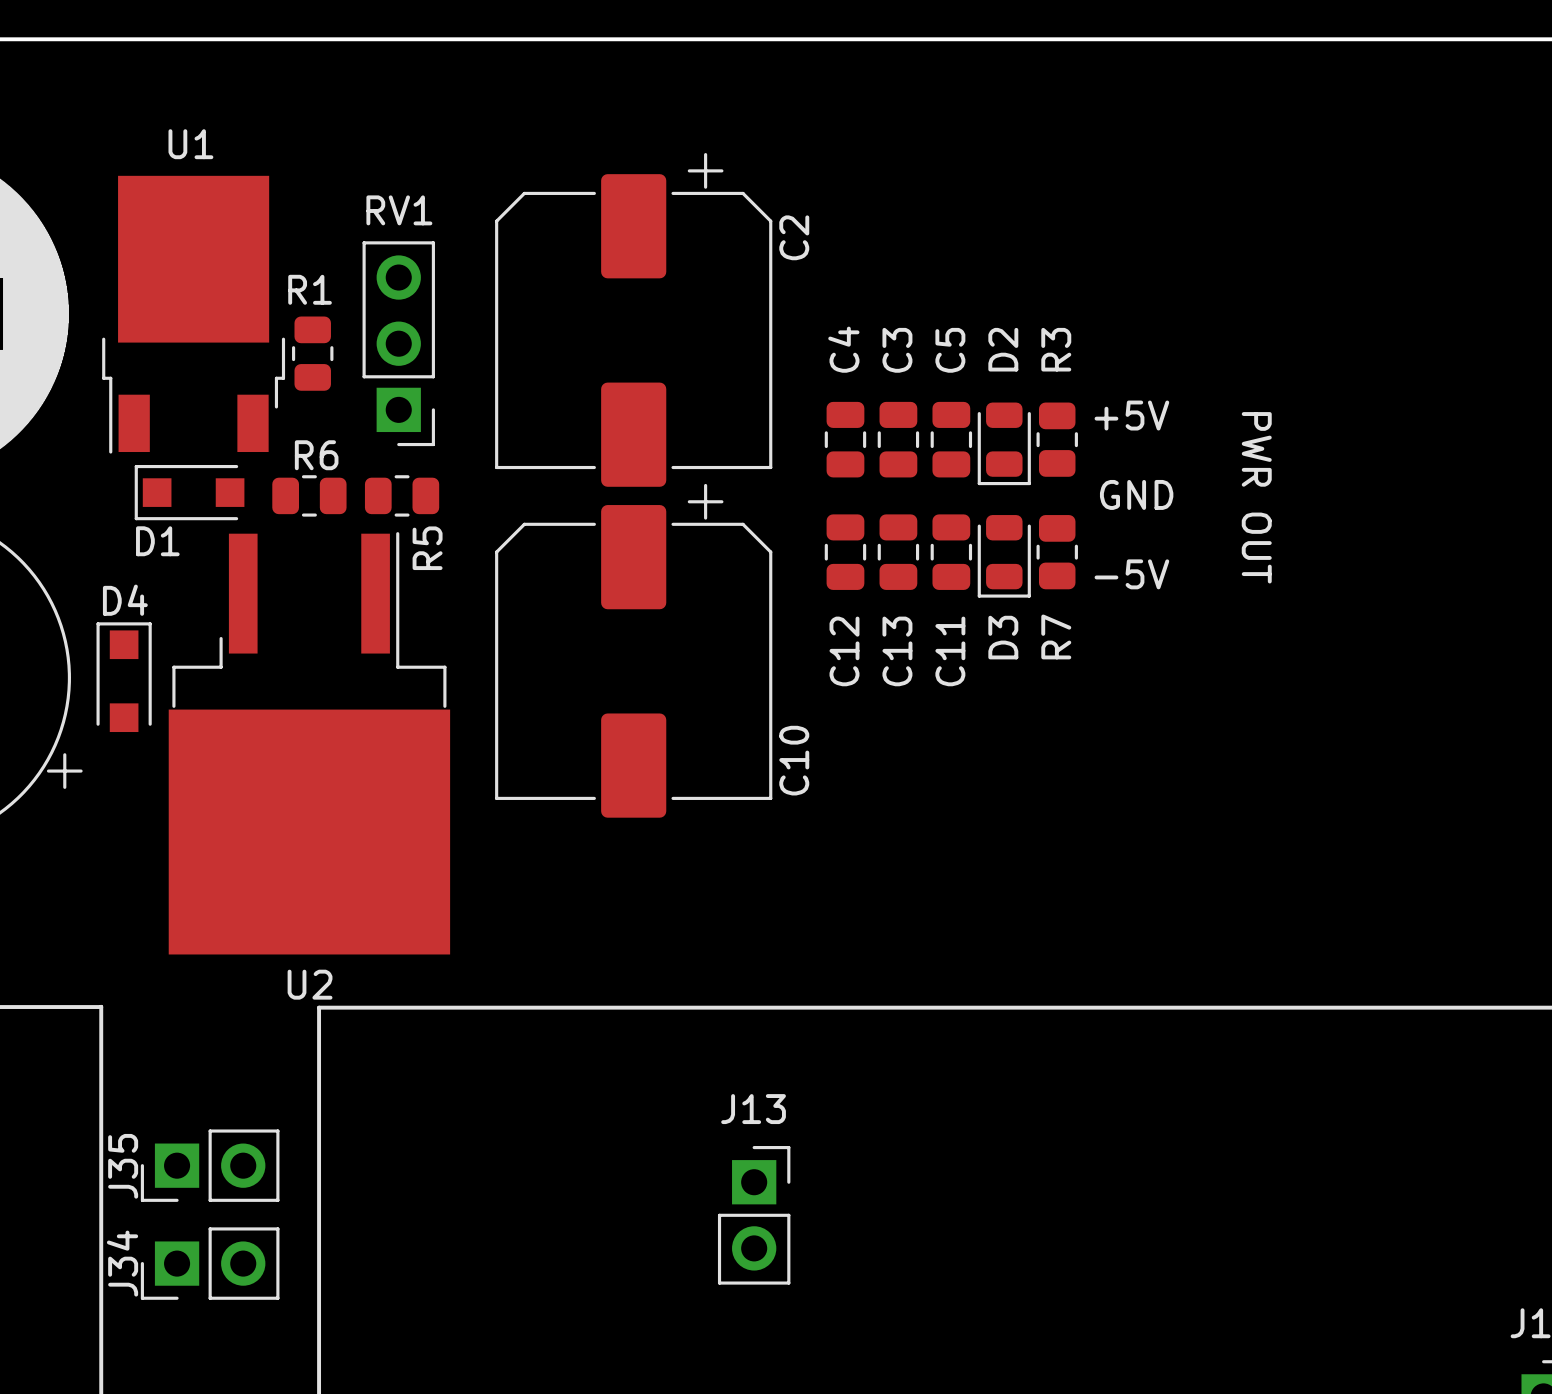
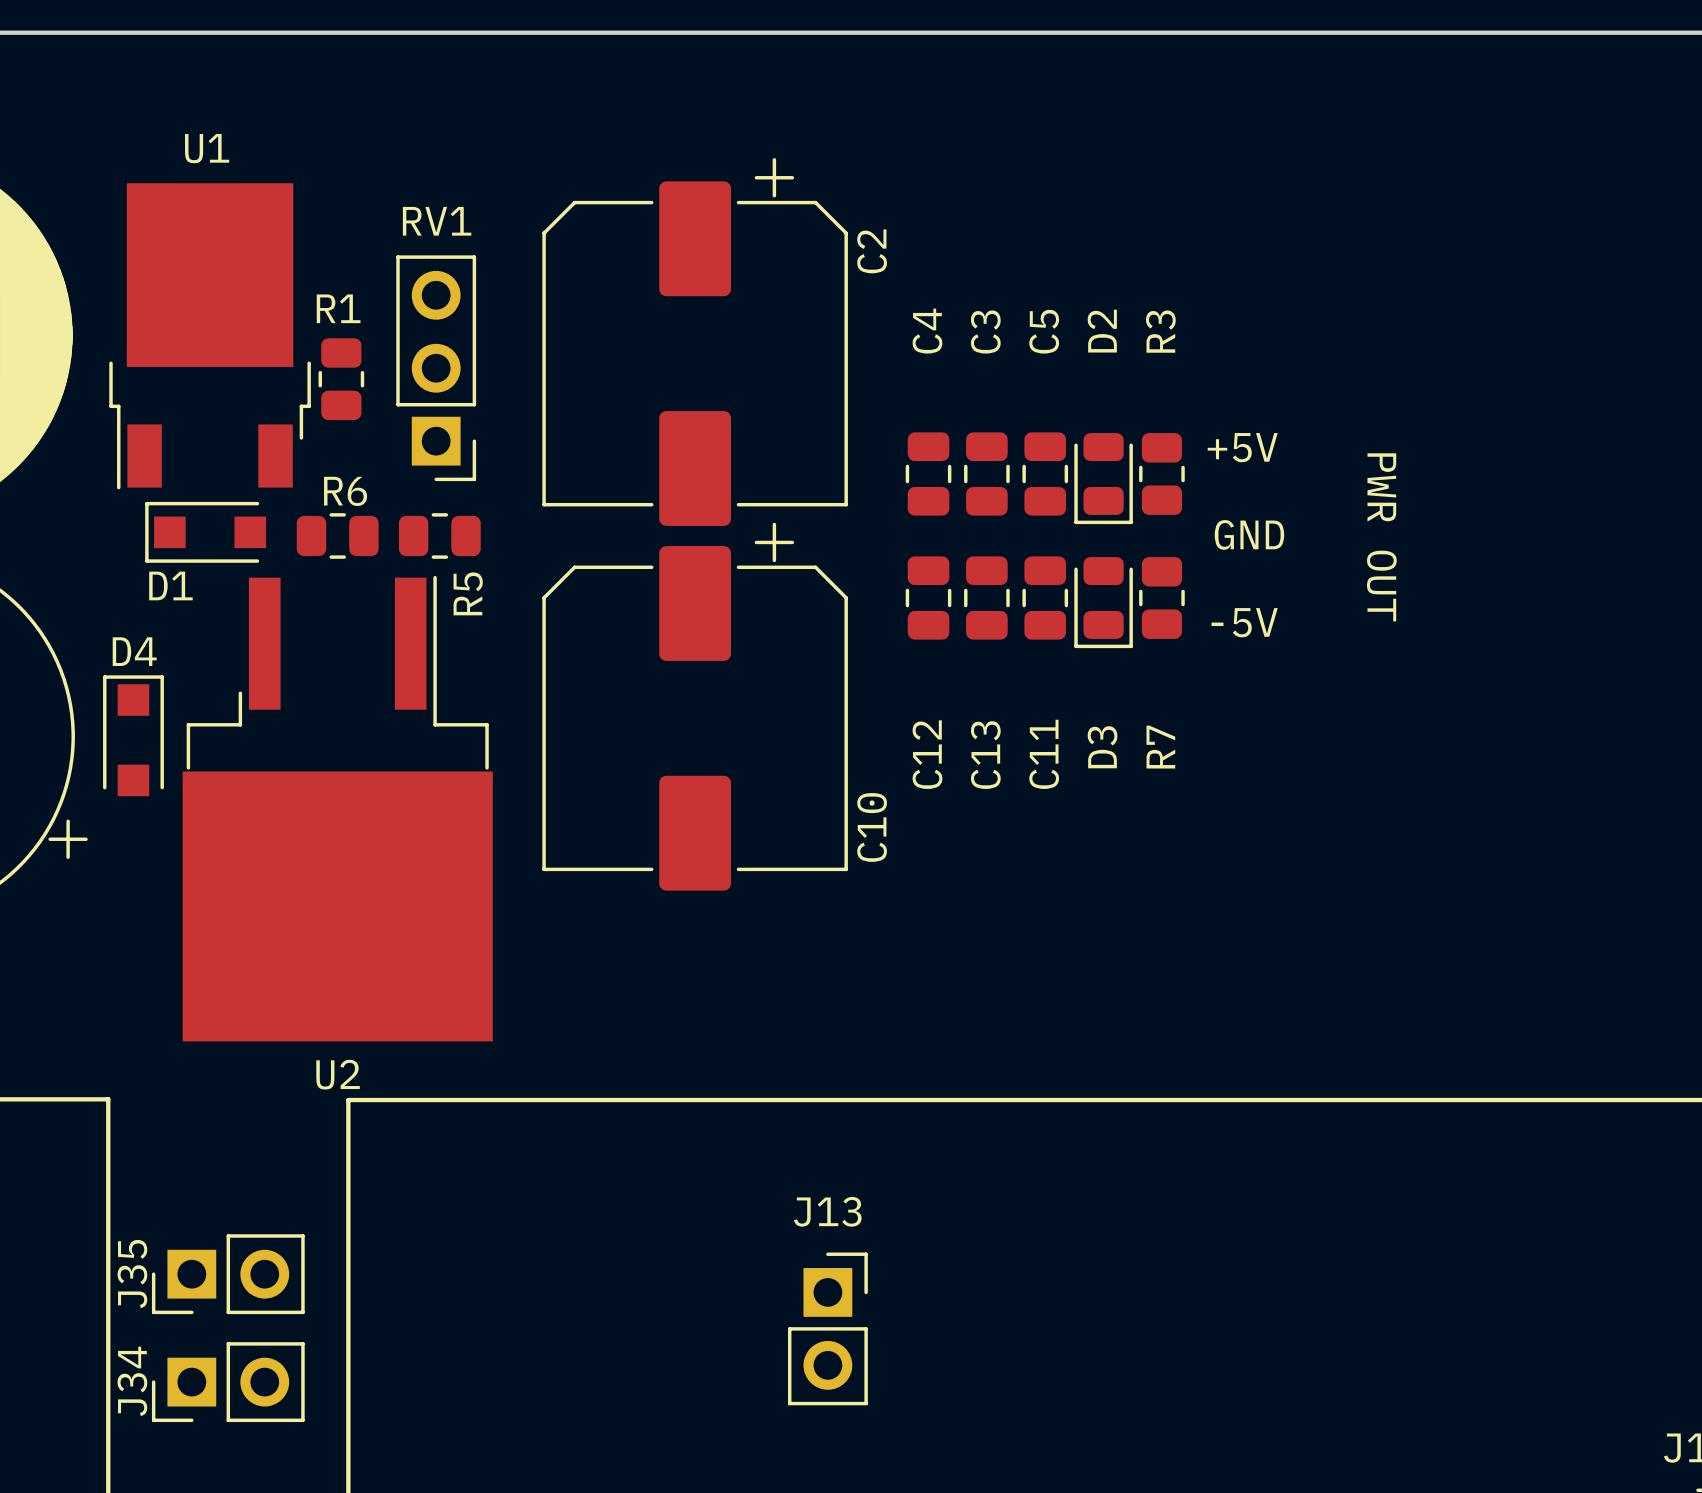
C4 name position: C4 (843, 349) -> C4 (927, 331)
D2 name position: D2 (1003, 349) -> D2 (1102, 331)
R3 name position: R3 (1056, 349) -> R3 (1160, 331)
C3 name position: C3 (897, 350) -> C3 (985, 332)
C5 name position: C5 (950, 350) -> C5 (1044, 331)
R7 name position: R7 (1056, 636) -> R7 (1160, 747)
D3 name position: D3 (1003, 637) -> D3 (1102, 747)
C12 name position: C12 (844, 651) -> C12 (927, 754)
C13 name position: C13 (897, 651) -> C13 (985, 755)
C11 name position: C11 (950, 651) -> C11 (1044, 754)

